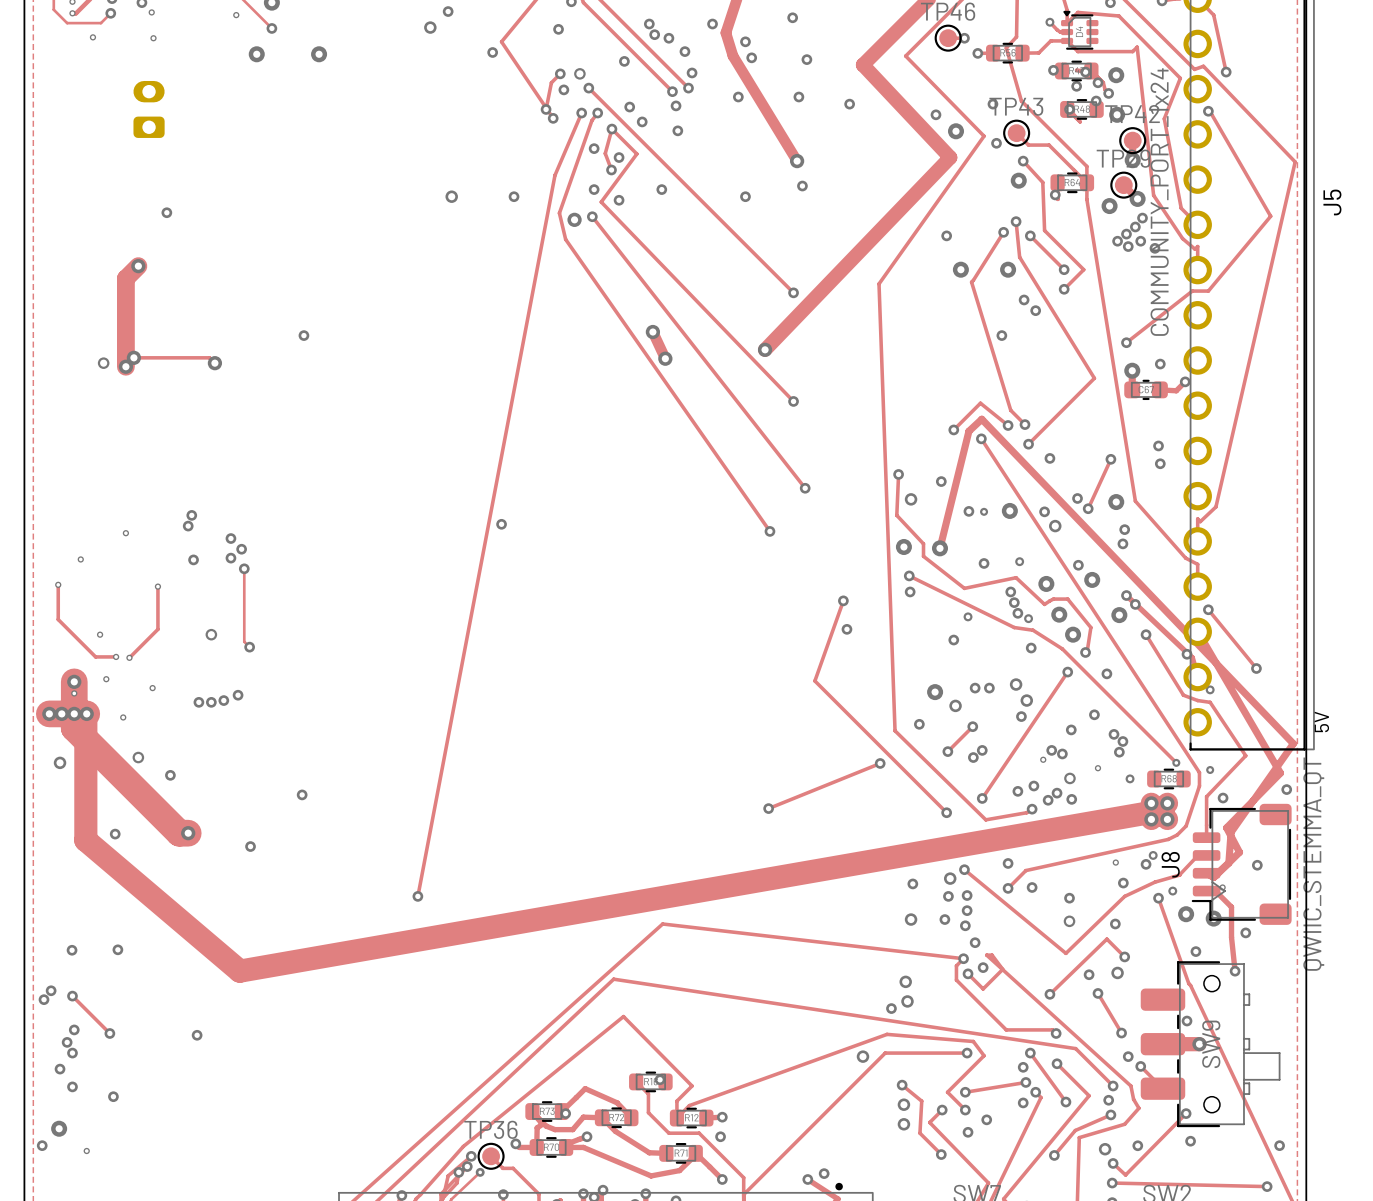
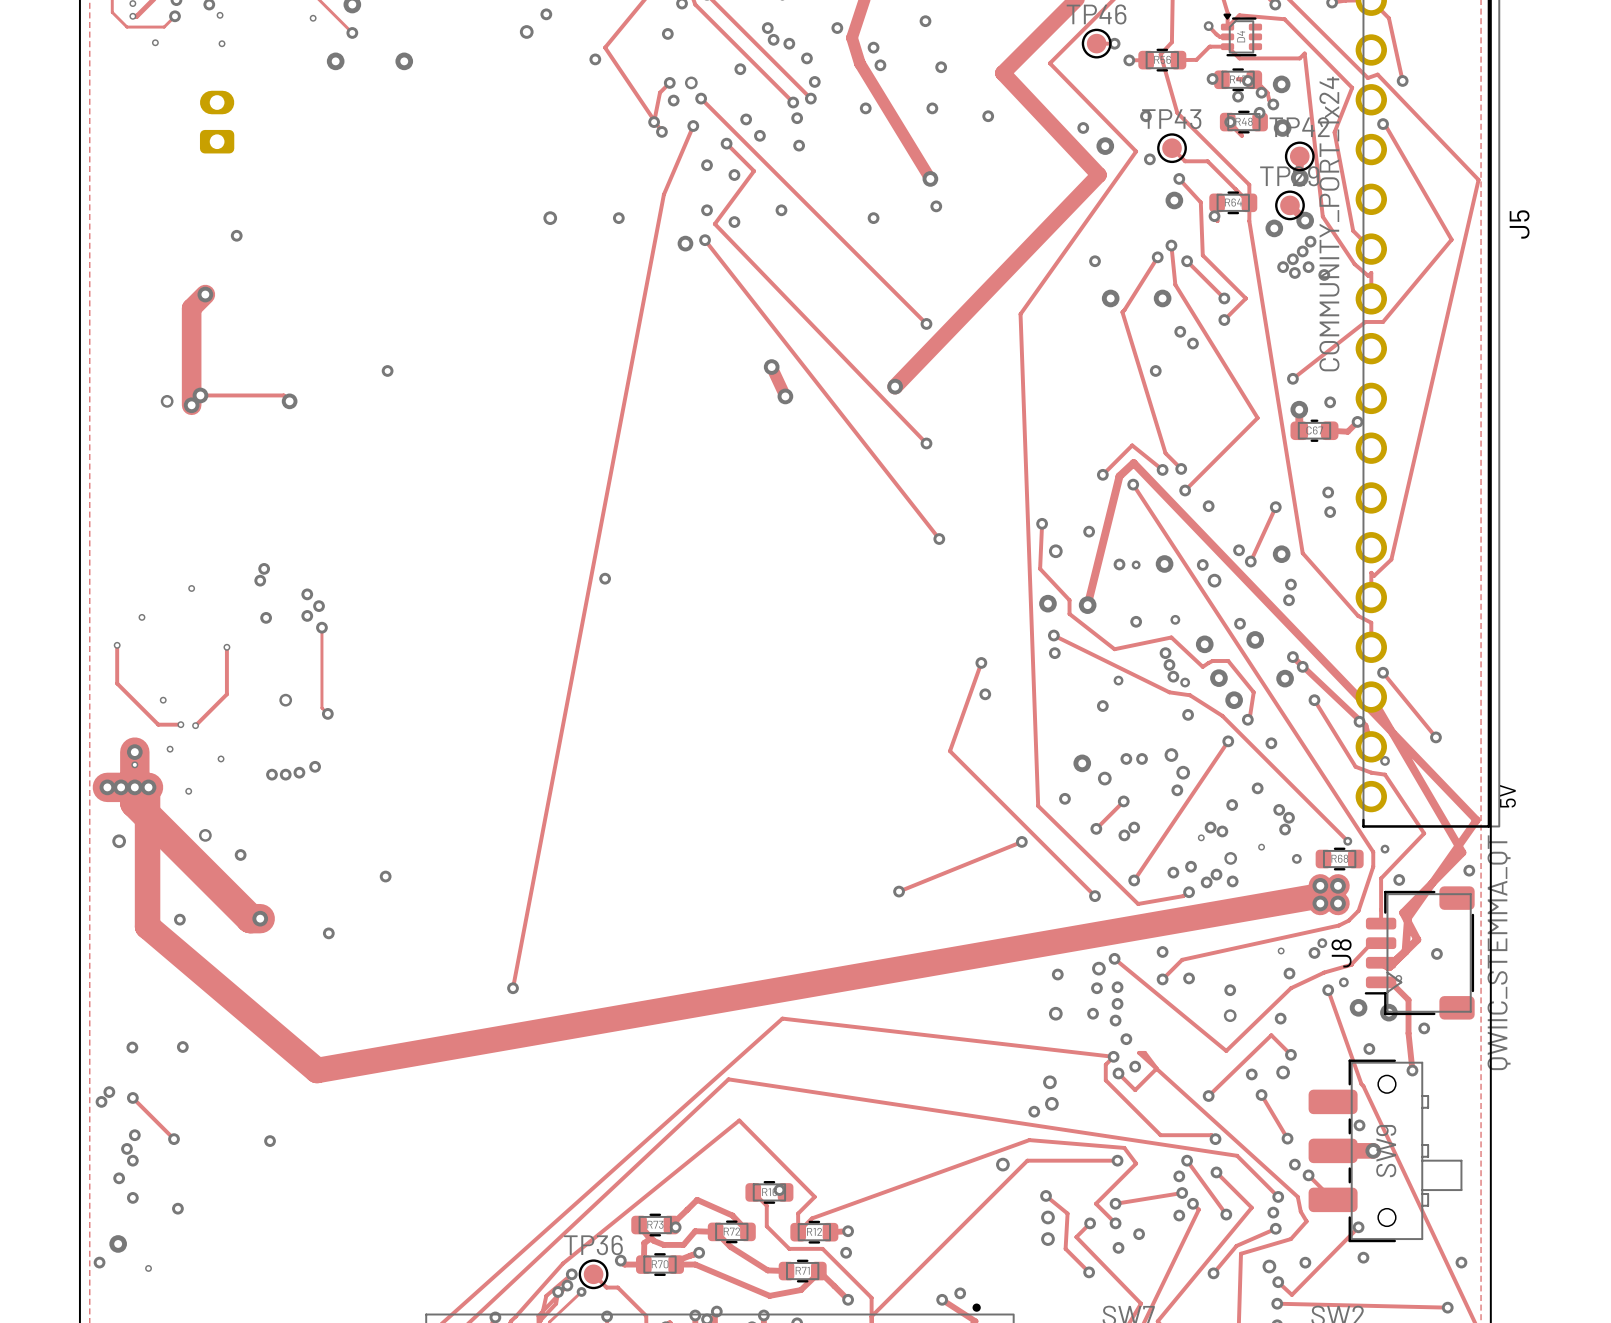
track: (597, 113) (591, 120) (559, 213) (565, 239) (769, 531) -> none
via: (597, 113) -> none
track: (611, 129) (605, 153) (611, 170) -> none
via: (611, 170) -> none
via: (769, 531) -> none

